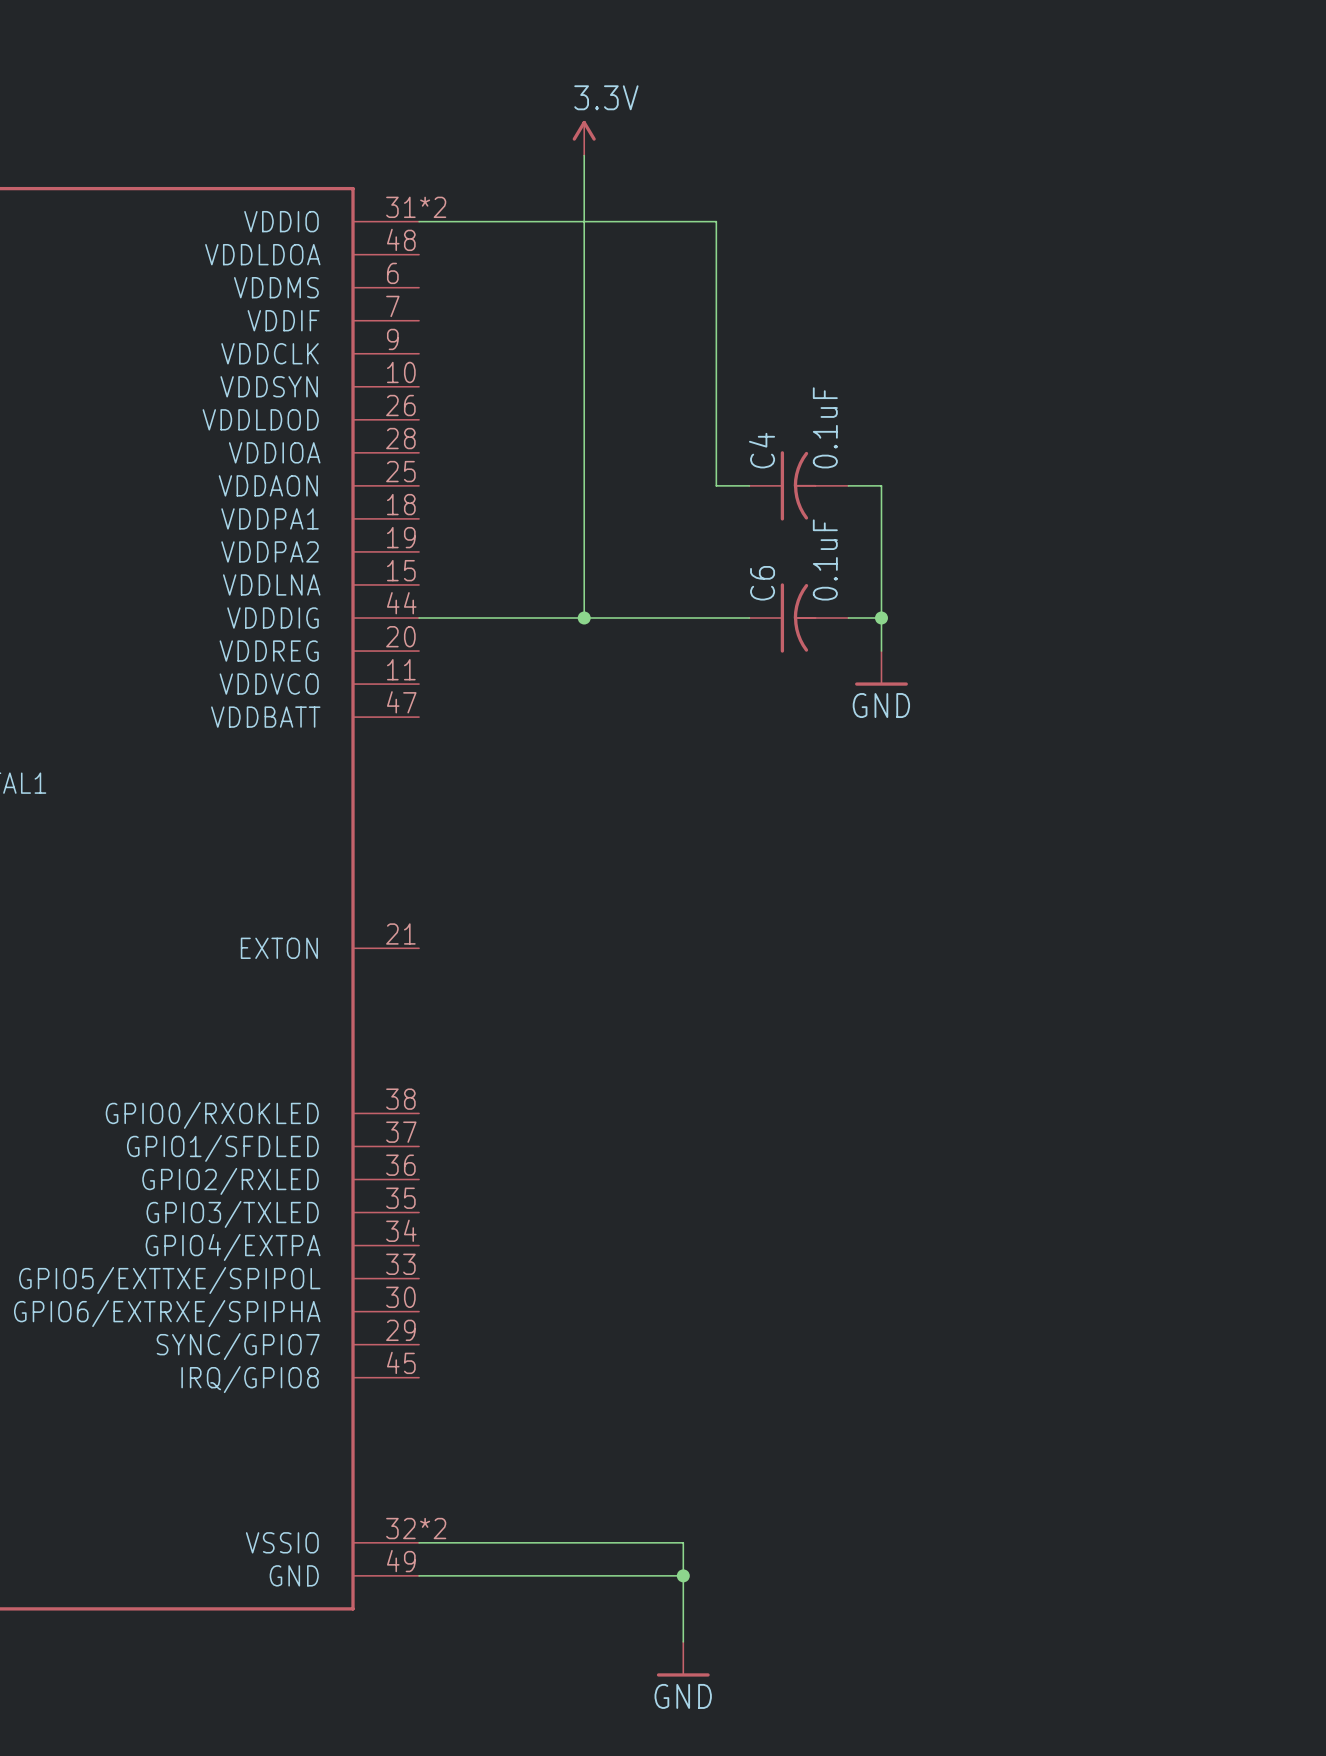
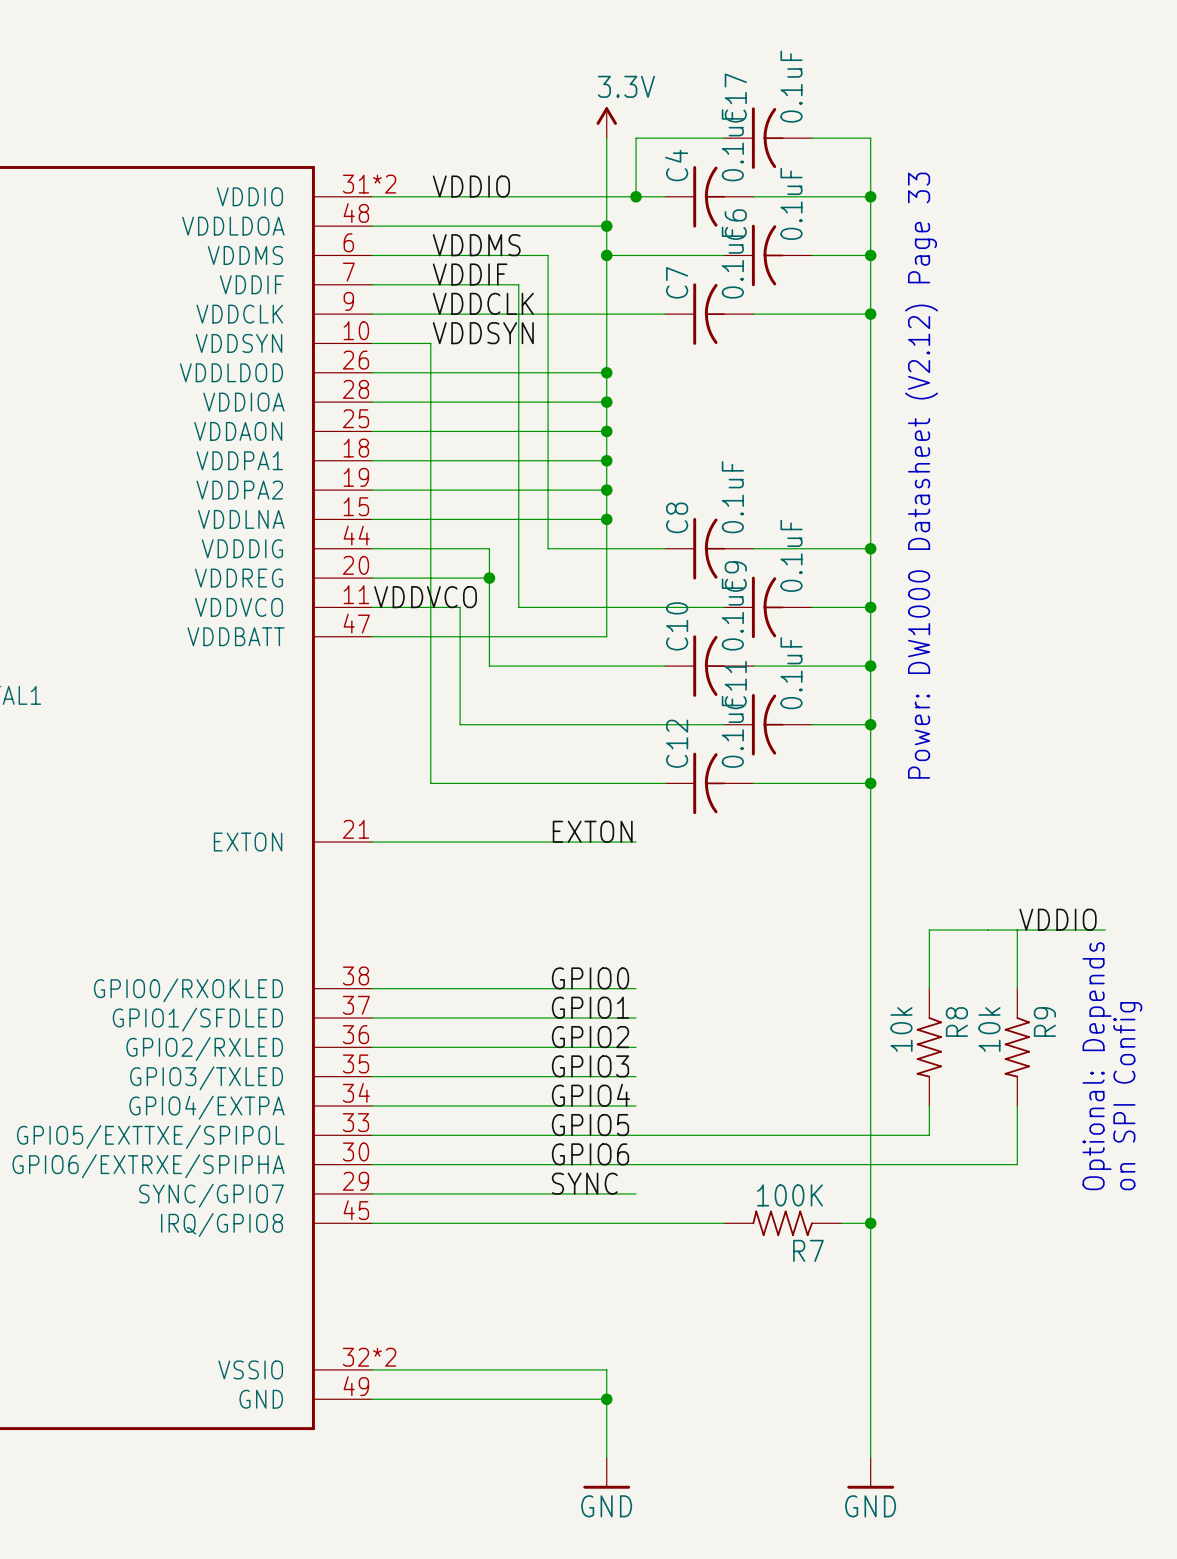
power symbol position: 3.3V (584, 138) -> 3.3V (606, 122)
wire: (584, 155) (584, 320) -> (372, 284) (518, 284)
wire: none -> (606, 138) (606, 636) (372, 636)
wire: none -> (724, 138) (636, 138) (636, 196) (665, 196)
C17: none -> 0.1uF (768, 138)
wire: none -> (812, 138) (870, 138) (870, 1457)
label: none -> VDDIO (471, 186)
wire: (716, 221) (716, 485) (749, 485) -> none
junction: none -> (636, 196)
wire: none -> (753, 196) (870, 196)
junction: none -> (870, 196)
wire: none -> (372, 226) (606, 226)
junction: none -> (606, 226)
label: none -> VDDMS (476, 245)
wire: none -> (372, 255) (548, 255) (548, 548)
wire: none -> (606, 255) (724, 255)
junction: none -> (606, 255)
C6: none -> 0.1uF (768, 255)
wire: none -> (812, 255) (870, 255)
junction: none -> (870, 255)
label: none -> VDDIF (470, 274)
label: none -> VDDCLK (483, 303)
wire: none -> (372, 314) (665, 314)
C7: none -> 0.1uF (709, 314)
wire: none -> (753, 314) (870, 314)
junction: none -> (870, 314)
label: none -> VDDSYN (483, 333)
wire: none -> (372, 343) (430, 343) (430, 783) (665, 783)
wire: none -> (372, 372) (606, 372)
junction: none -> (606, 372)
wire: none -> (372, 402) (606, 402)
junction: none -> (606, 402)
wire: none -> (372, 431) (606, 431)
junction: none -> (606, 431)
C4 position: (798, 485) -> (709, 196)
wire: (848, 485) (881, 485) (881, 651) -> none
wire: none -> (372, 460) (606, 460)
junction: none -> (606, 460)
text: none -> Power: DW1000 Datasheet (V2.12) Page 33 (921, 475)
wire: none -> (372, 490) (606, 490)
junction: none -> (606, 490)
C6 name: C6 (762, 583) -> C8 (677, 517)
wire: none -> (372, 519) (606, 519)
junction: none -> (606, 519)
wire: (551, 618) (617, 618) -> (489, 548) (489, 666) (665, 666)
wire: none -> (518, 548) (518, 607) (724, 607)
junction position: (584, 618) -> (489, 578)
wire: none -> (782, 548) (870, 548)
junction: (881, 618) -> none
junction: none -> (870, 548)
wire: none -> (372, 578) (489, 578)
power symbol: GND (881, 668) -> none
label: none -> VDDVCO (425, 597)
wire: none -> (372, 607) (460, 607) (460, 724) (724, 724)
C9: none -> 0.1uF (768, 607)
wire: none -> (812, 607) (870, 607)
junction: none -> (870, 607)
C10: none -> 0.1uF (709, 666)
wire: none -> (753, 666) (870, 666)
junction: none -> (870, 666)
C11: none -> 0.1uF (768, 724)
wire: none -> (812, 724) (870, 724)
junction: none -> (870, 724)
C12: none -> 0.1uF (709, 783)
wire: none -> (753, 783) (870, 783)
junction: none -> (870, 783)
label: none -> EXTON (592, 831)
wire: none -> (372, 842) (636, 842)
label: none -> VDDIO (1058, 919)
wire: none -> (1017, 930) (1017, 988)
wire: none -> (1105, 930) (929, 930) (929, 988)
label: none -> GPIO0 (590, 978)
wire: none -> (372, 988) (636, 988)
label: none -> GPIO1 (590, 1007)
wire: none -> (372, 1017) (636, 1017)
label: none -> GPIO2 (590, 1037)
wire: none -> (372, 1047) (636, 1047)
R8: none -> 10k (929, 1047)
R9: none -> 10k (1017, 1047)
label: none -> GPIO3 (590, 1066)
text: none -> Optional: Depends (1097, 1066)
wire: none -> (372, 1076) (636, 1076)
label: none -> GPIO4 (590, 1095)
text: none -> on SPI Config (1127, 1096)
wire: none -> (372, 1105) (636, 1105)
wire: none -> (929, 1105) (929, 1135) (372, 1135)
wire: none -> (1017, 1105) (1017, 1164) (372, 1164)
label: none -> GPIO5 (590, 1125)
label: none -> GPIO6 (590, 1154)
label: none -> SYNC (584, 1183)
wire: none -> (372, 1193) (636, 1193)
wire: none -> (372, 1223) (724, 1223)
R7: none -> 100K (782, 1223)
wire: none -> (841, 1223) (870, 1223)
junction: none -> (870, 1223)
power symbol: none -> GND (870, 1473)

